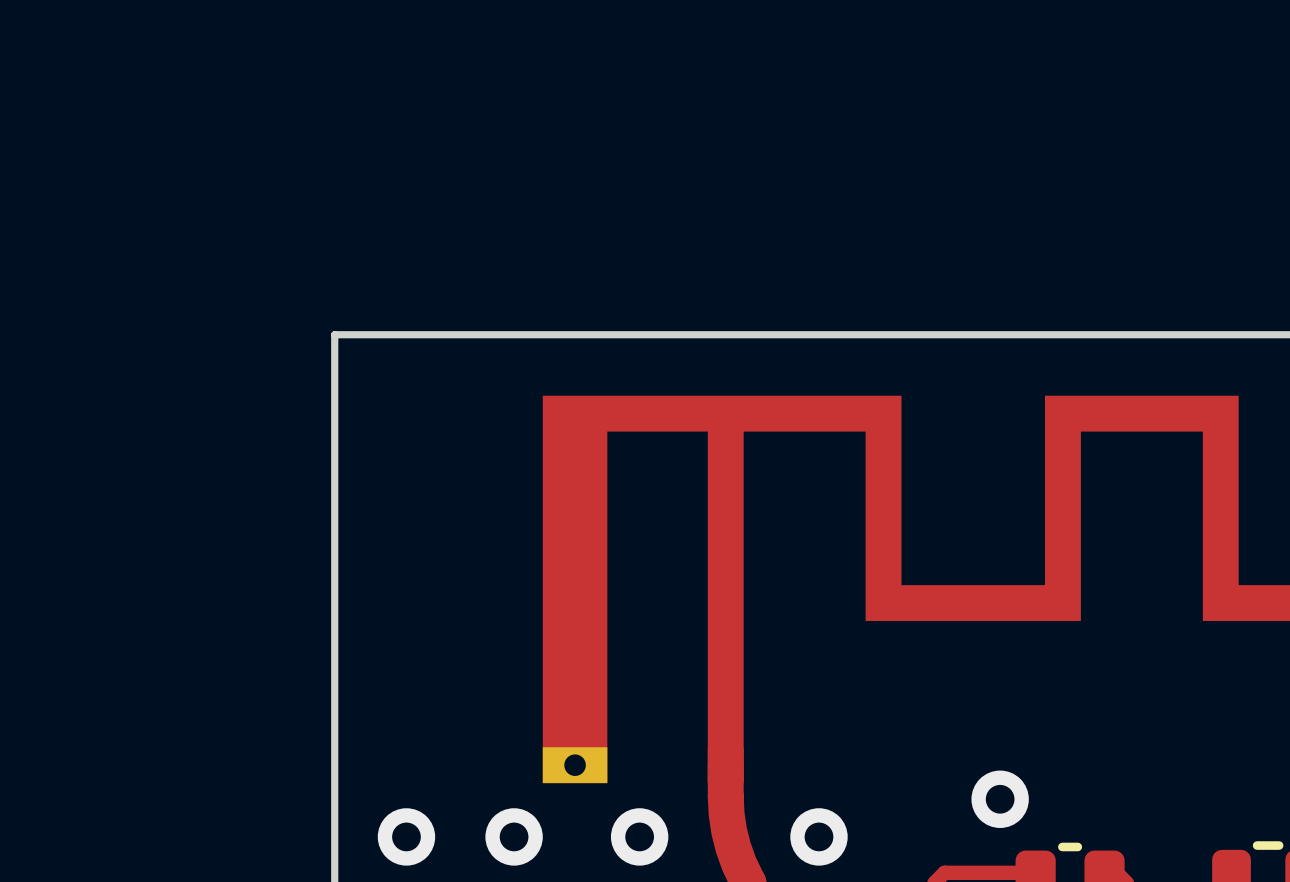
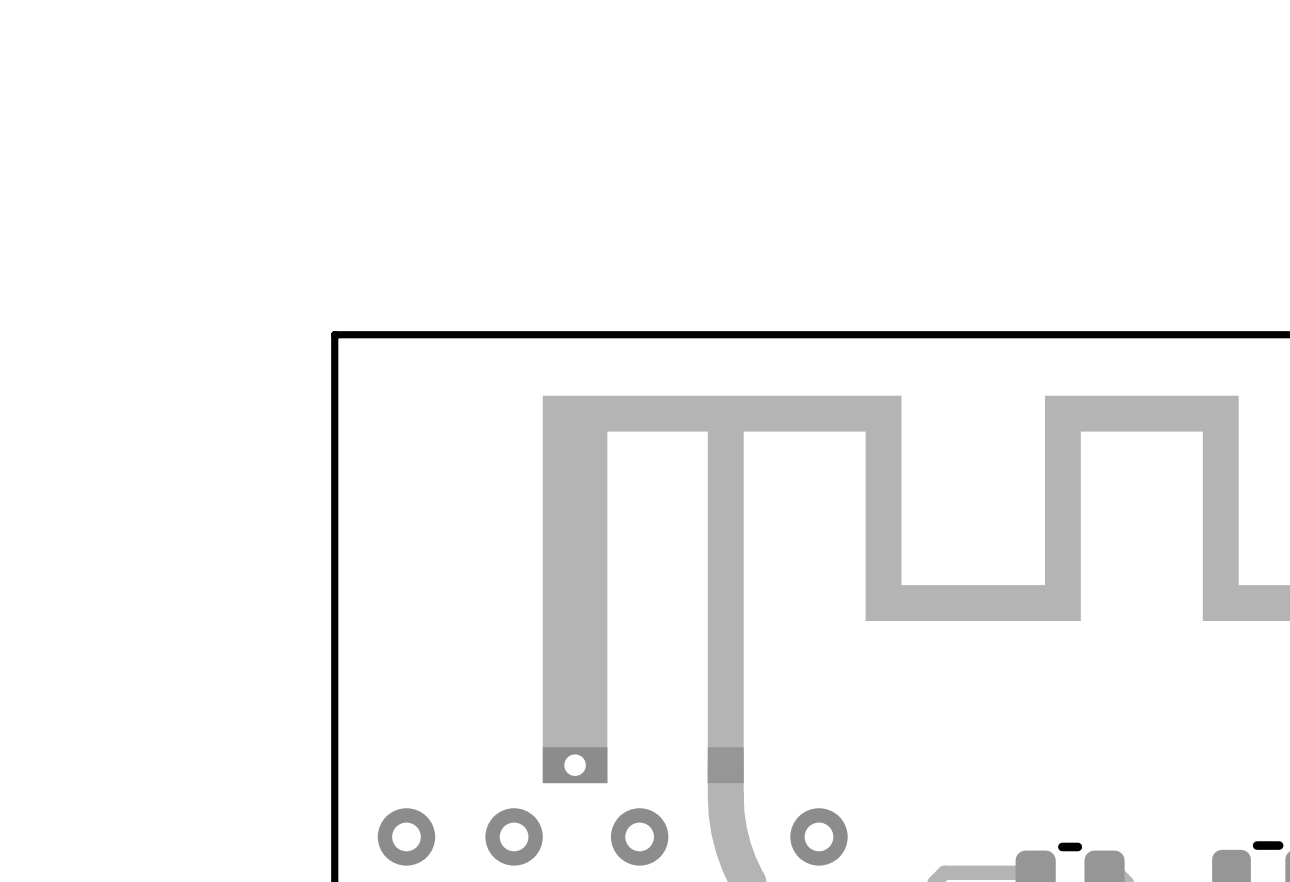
via: (1000, 799) -> none

